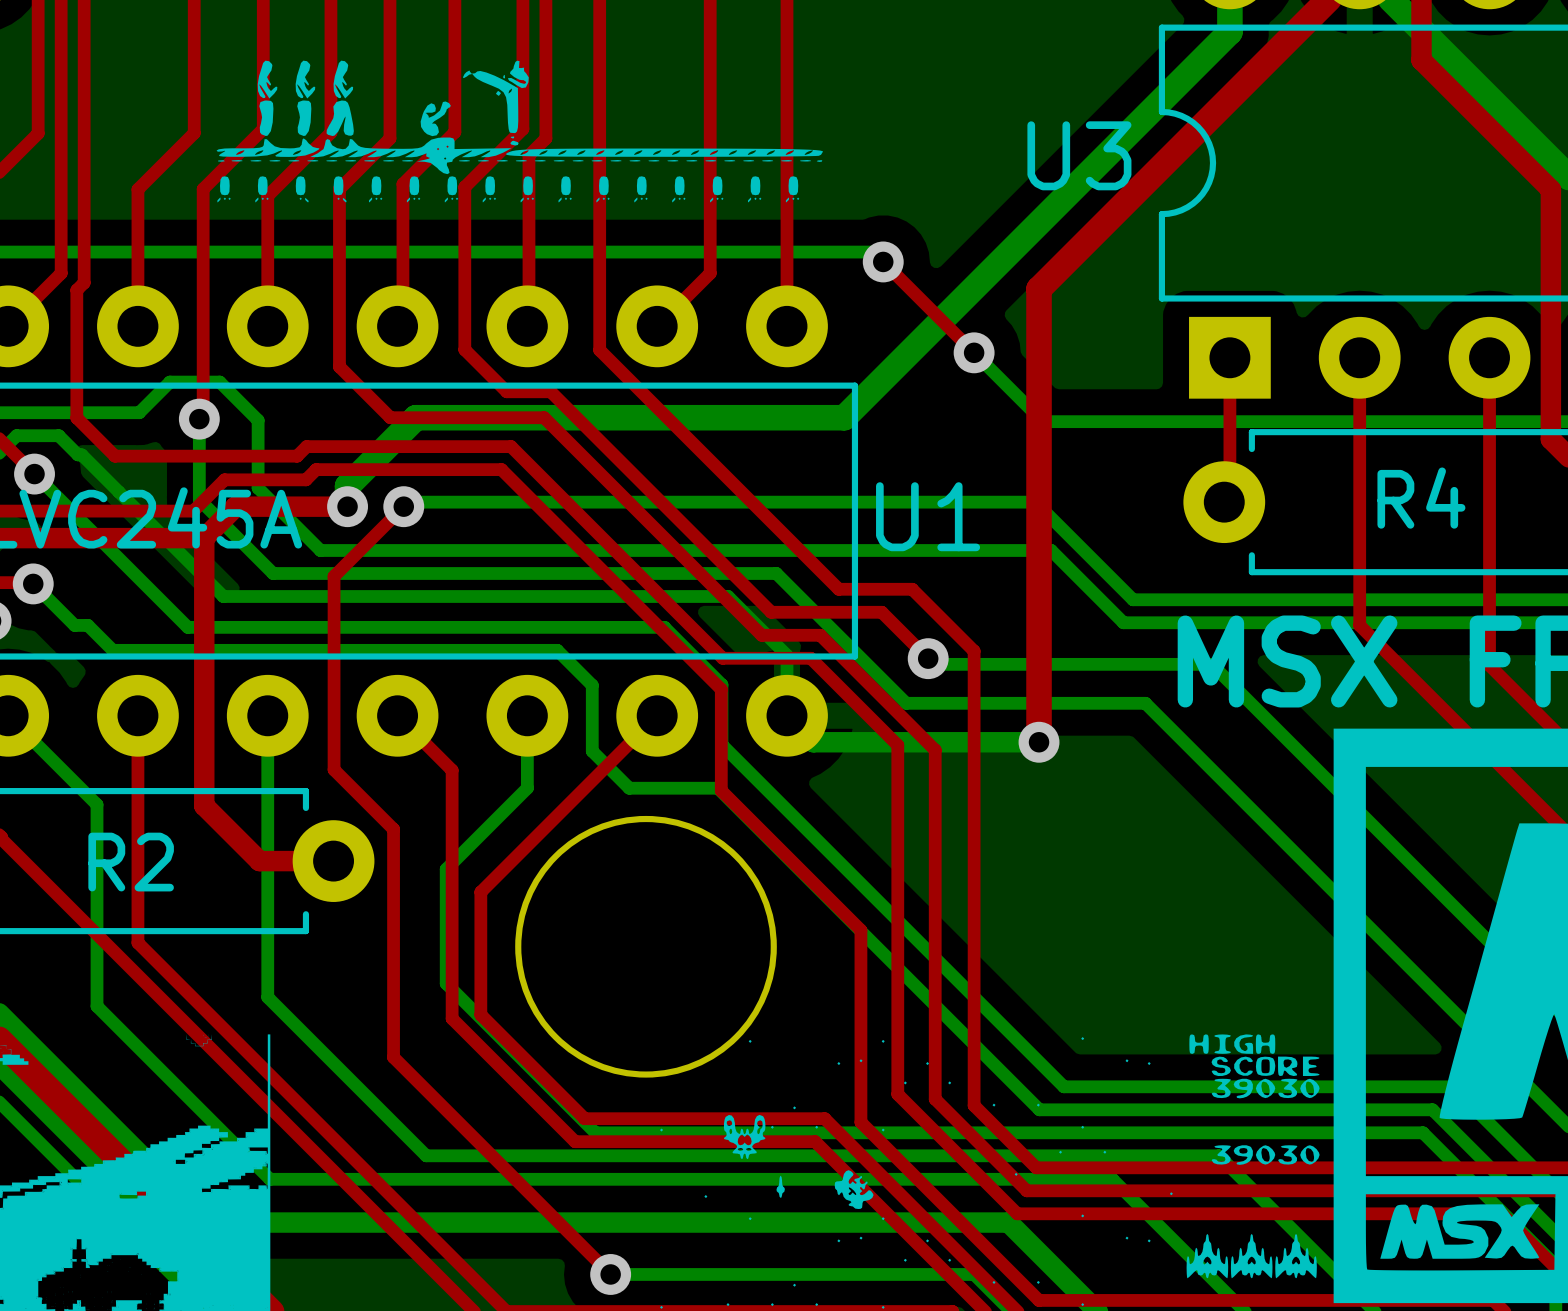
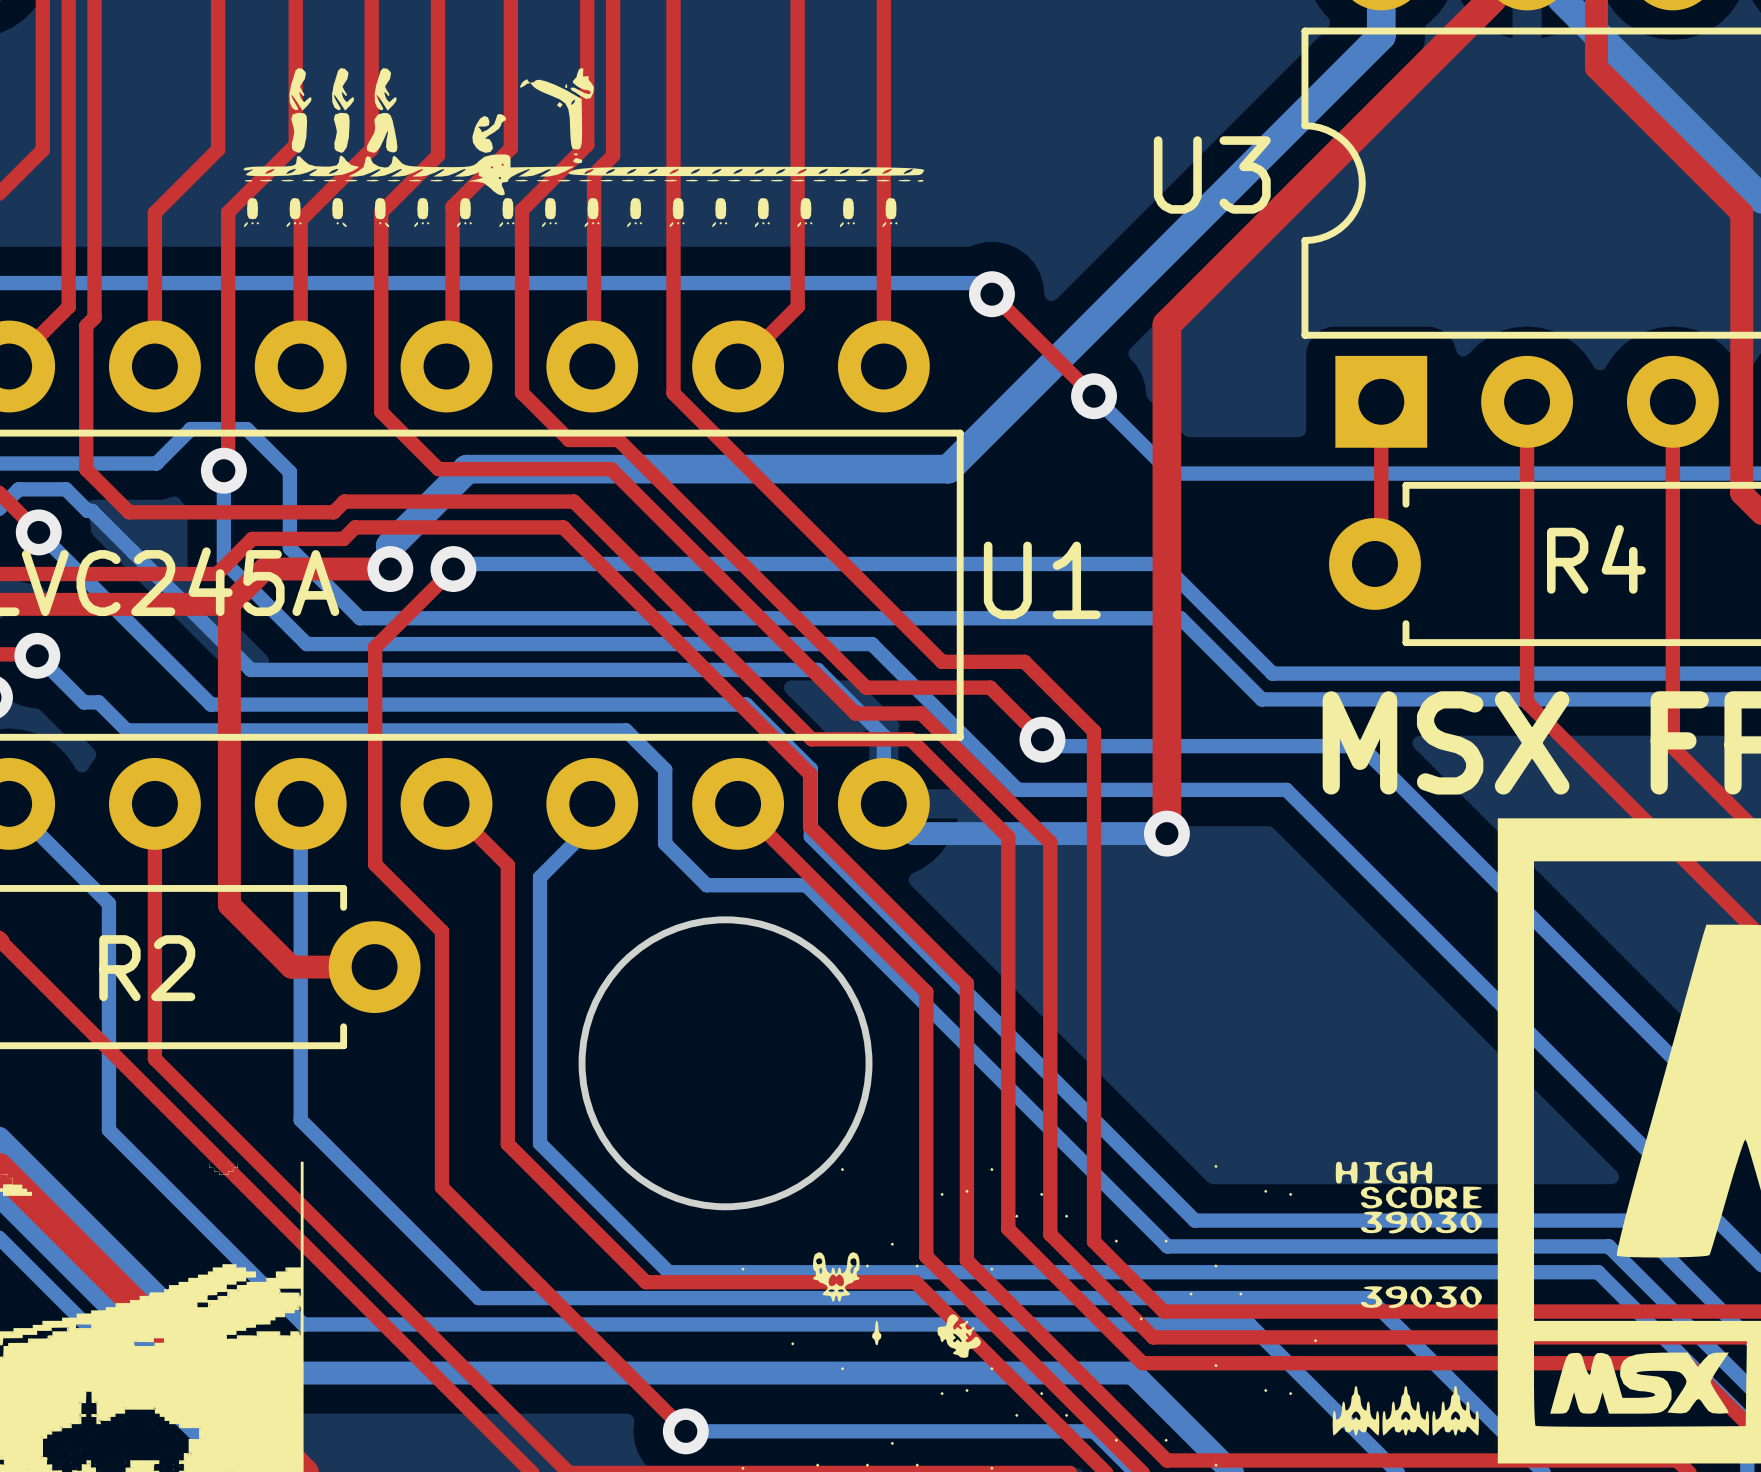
top track: (657, 715) (480, 892) (480, 1014) (584, 1118) (824, 1118) -> (738, 803) (926, 992) (926, 1256)
bottom track: (527, 734) (527, 788) (446, 869) (446, 983) (480, 1018) -> (592, 825) (540, 877) (540, 1143)
top track: (721, 736) (721, 790) (860, 930) -> (810, 826) (966, 983) (966, 1044)

